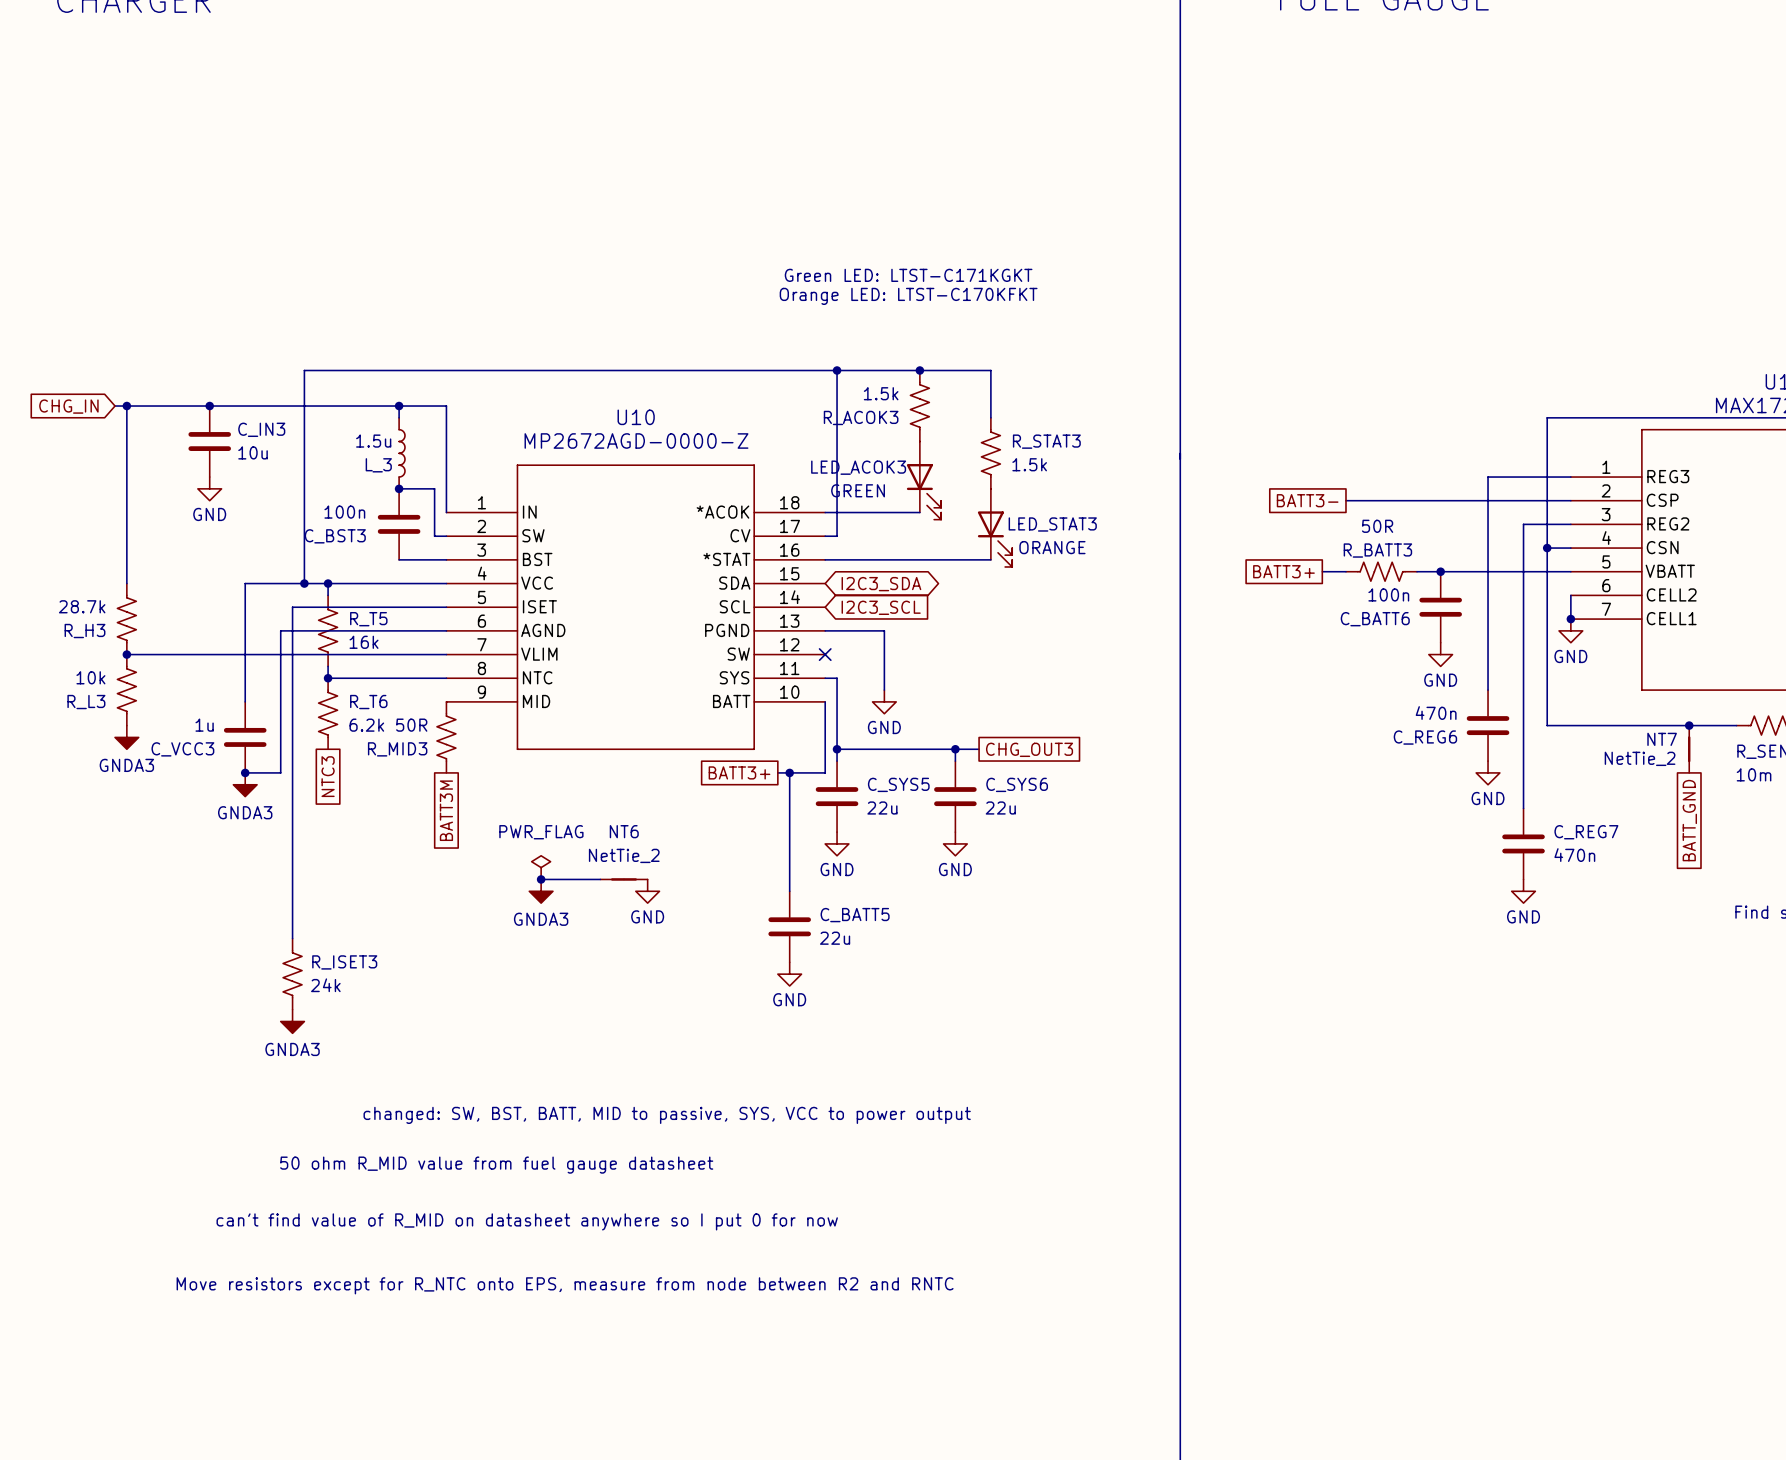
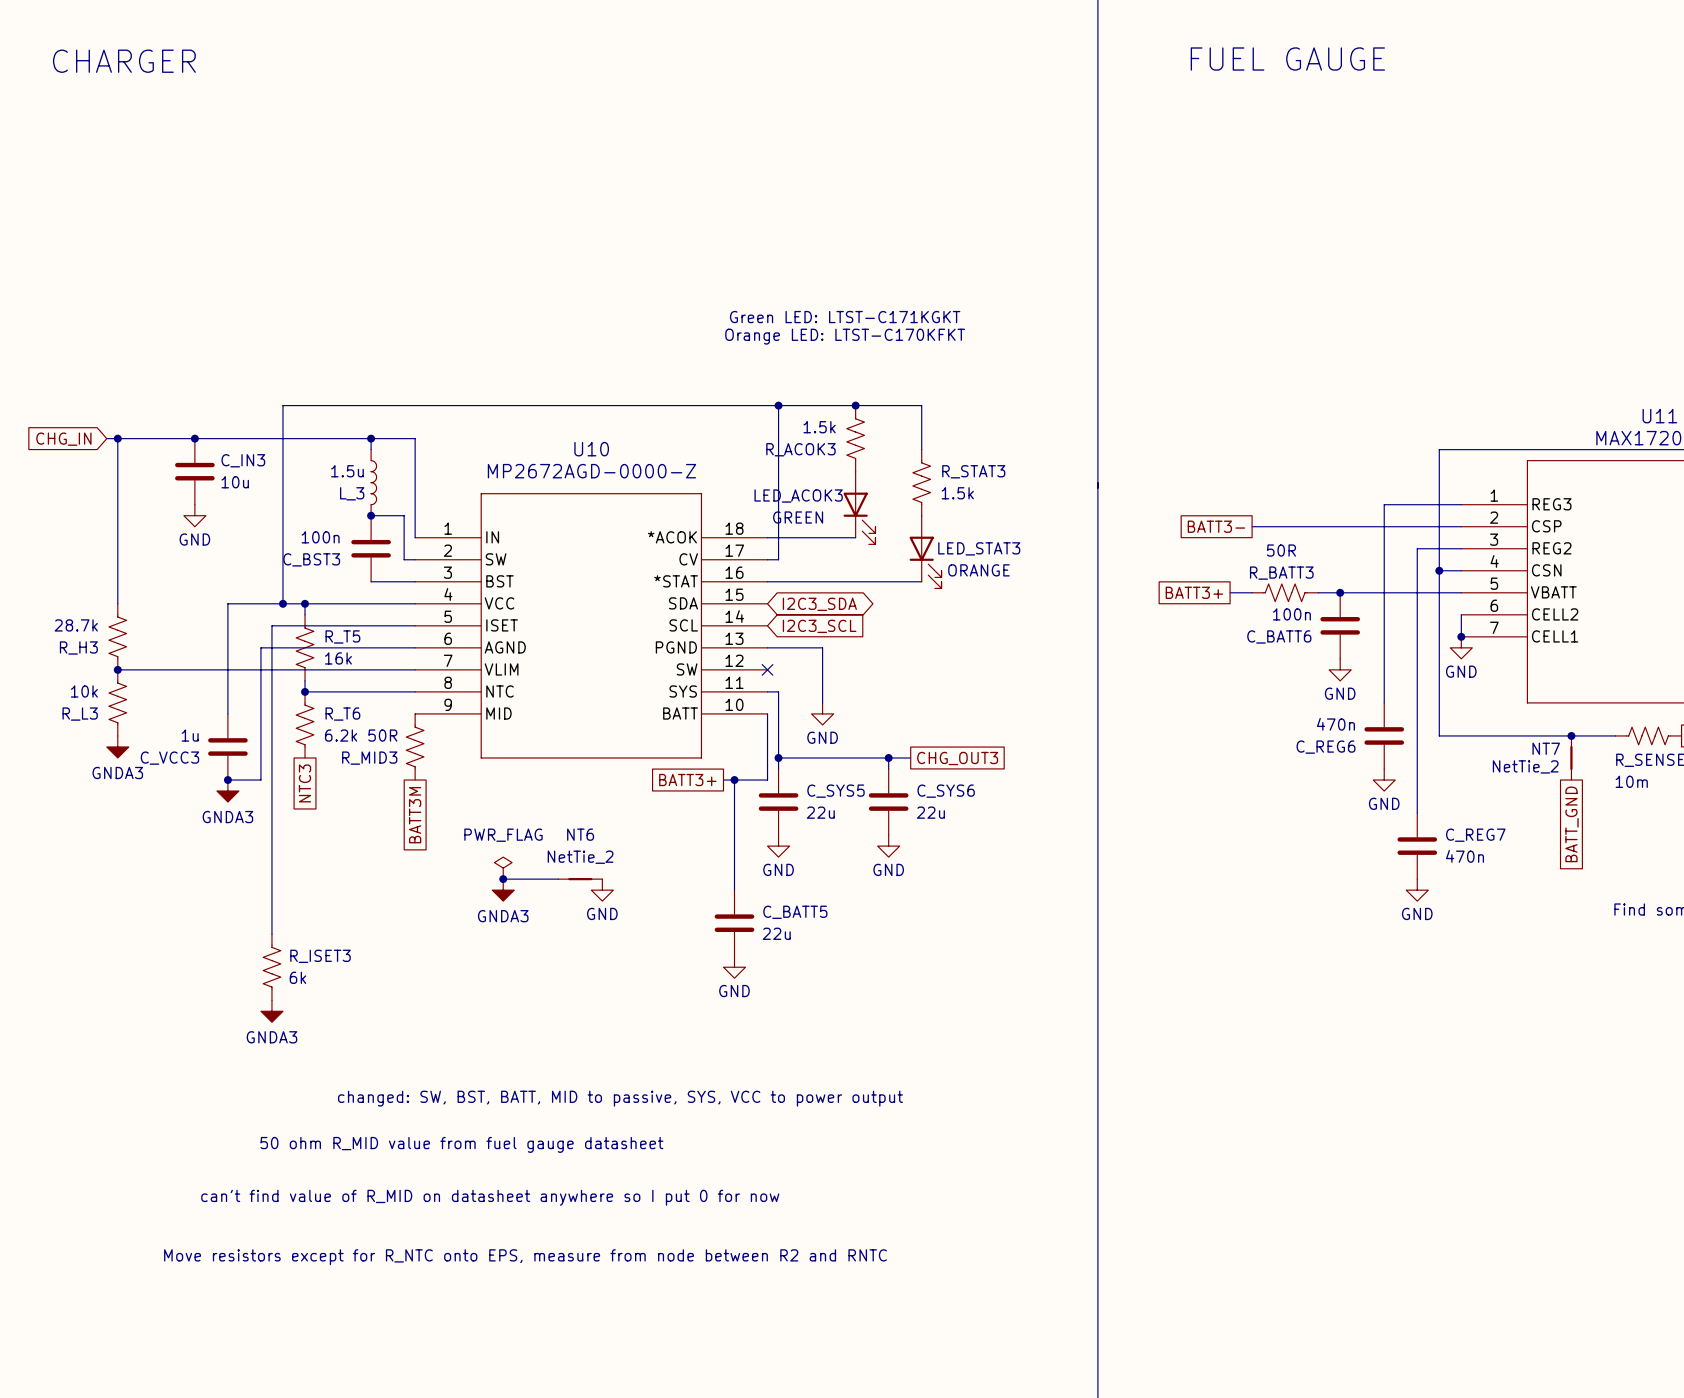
R_ISET3 value: 24k (325, 985) -> 6k (297, 977)

